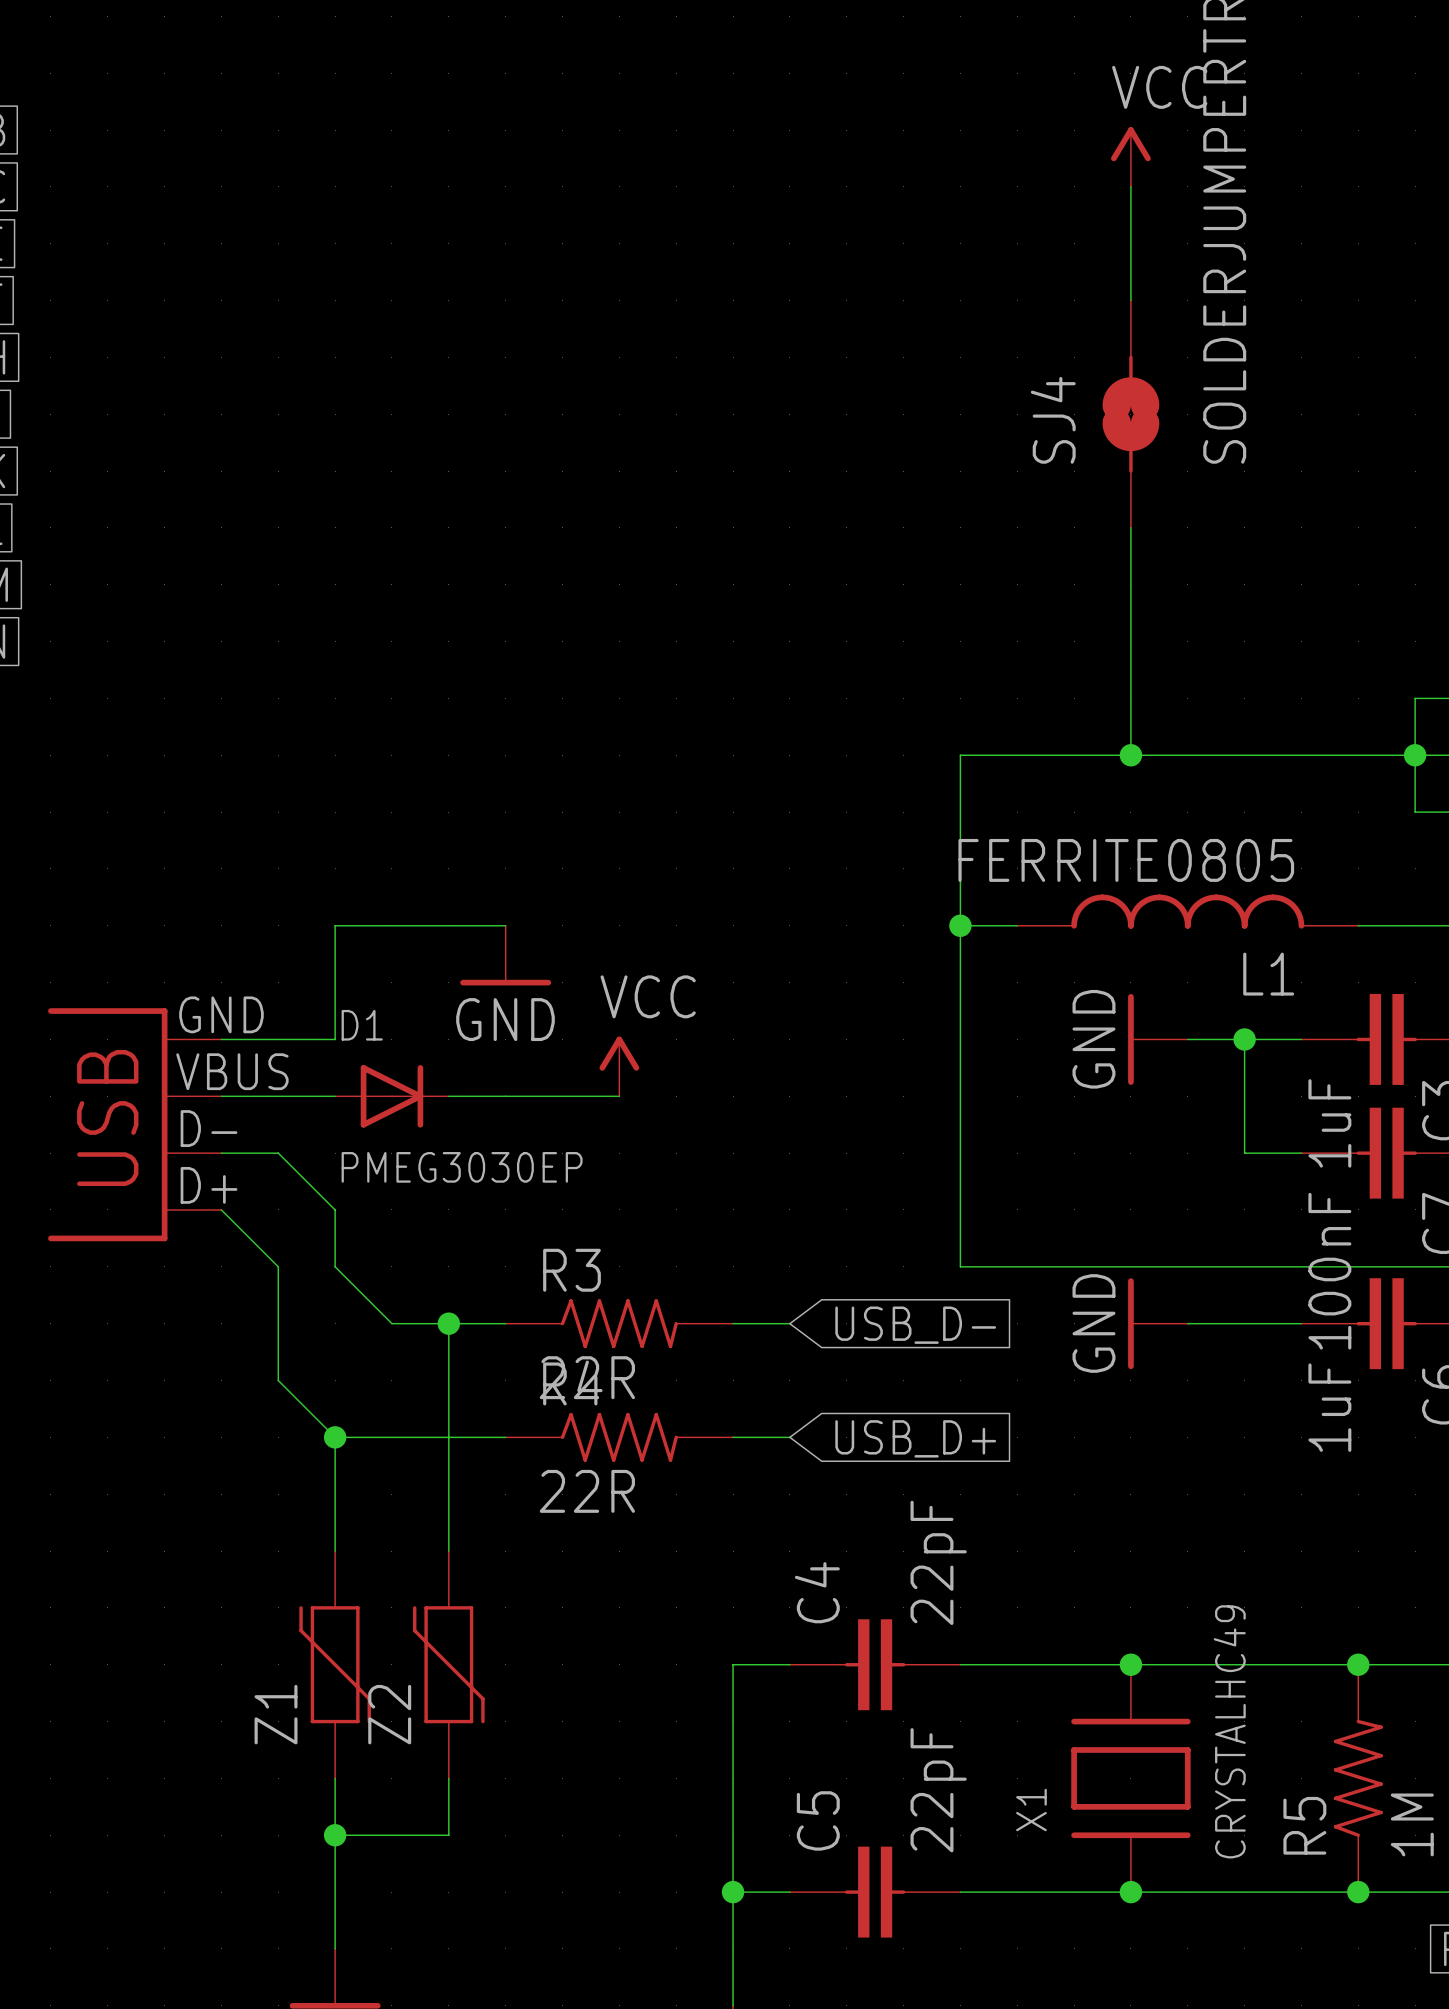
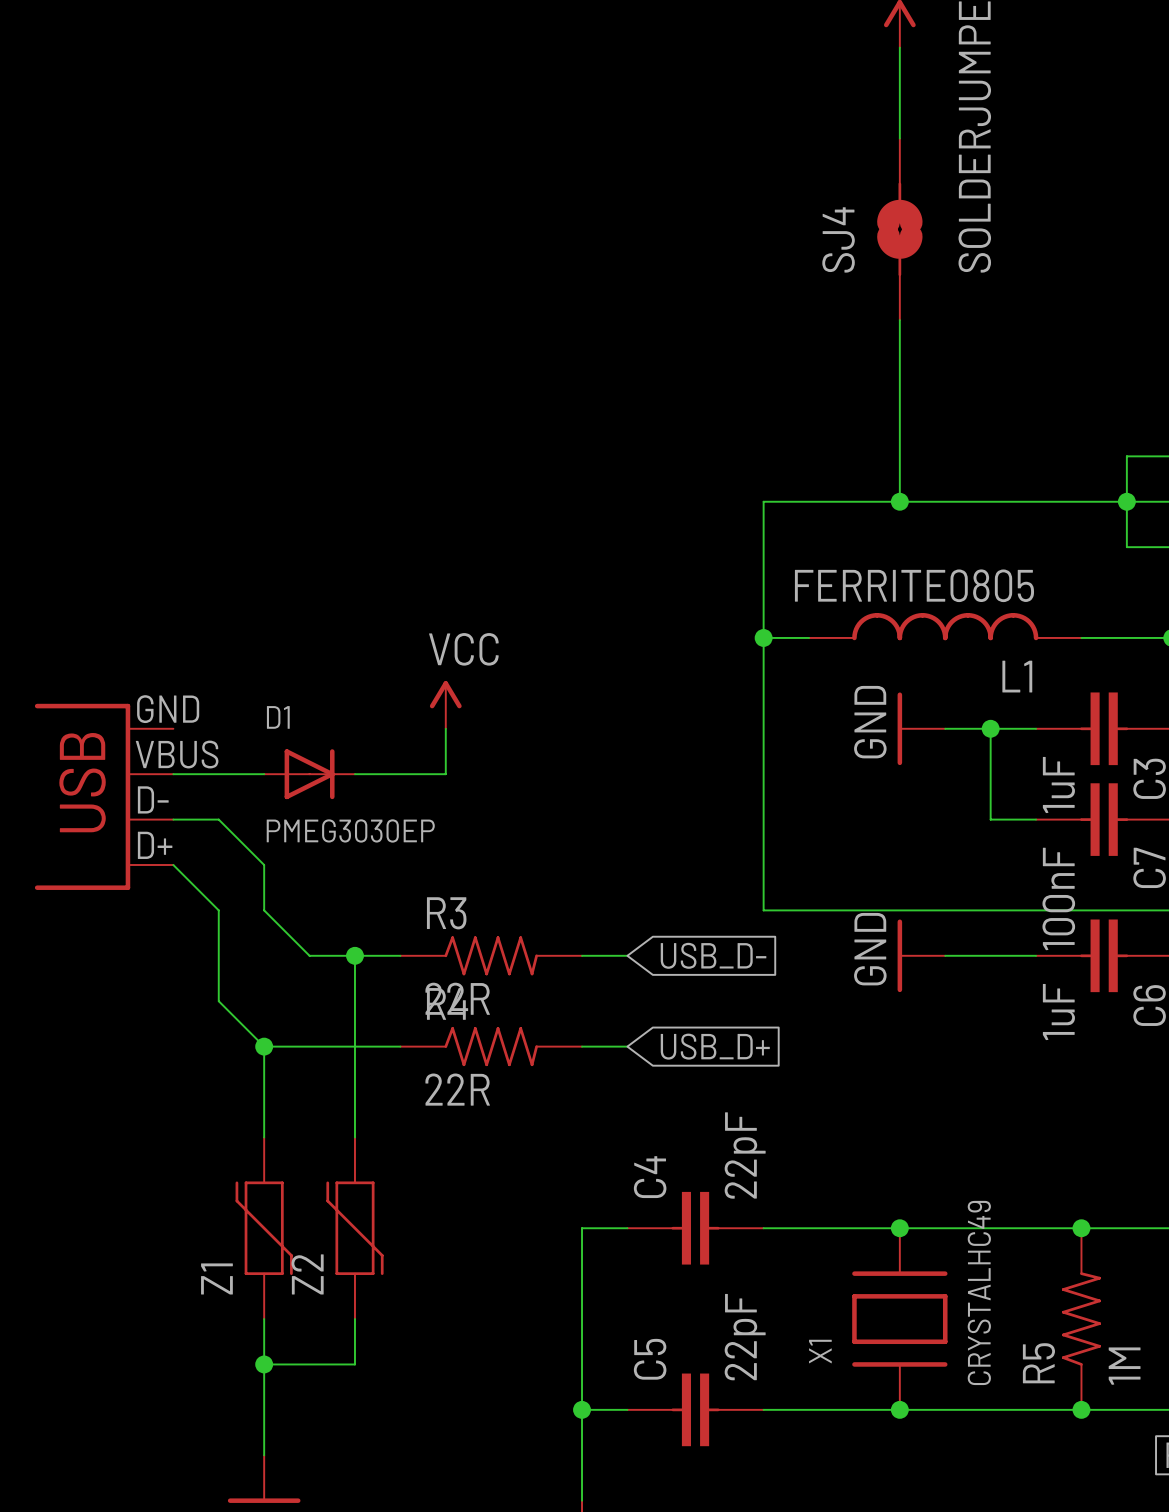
wire: (505, 925) (335, 925) (335, 1039) (221, 1039) -> none
power symbol: GND (505, 955) -> none
power symbol position: VCC (619, 1066) -> VCC (445, 704)
wire: (562, 1096) (619, 1096) -> (445, 774) (445, 728)

